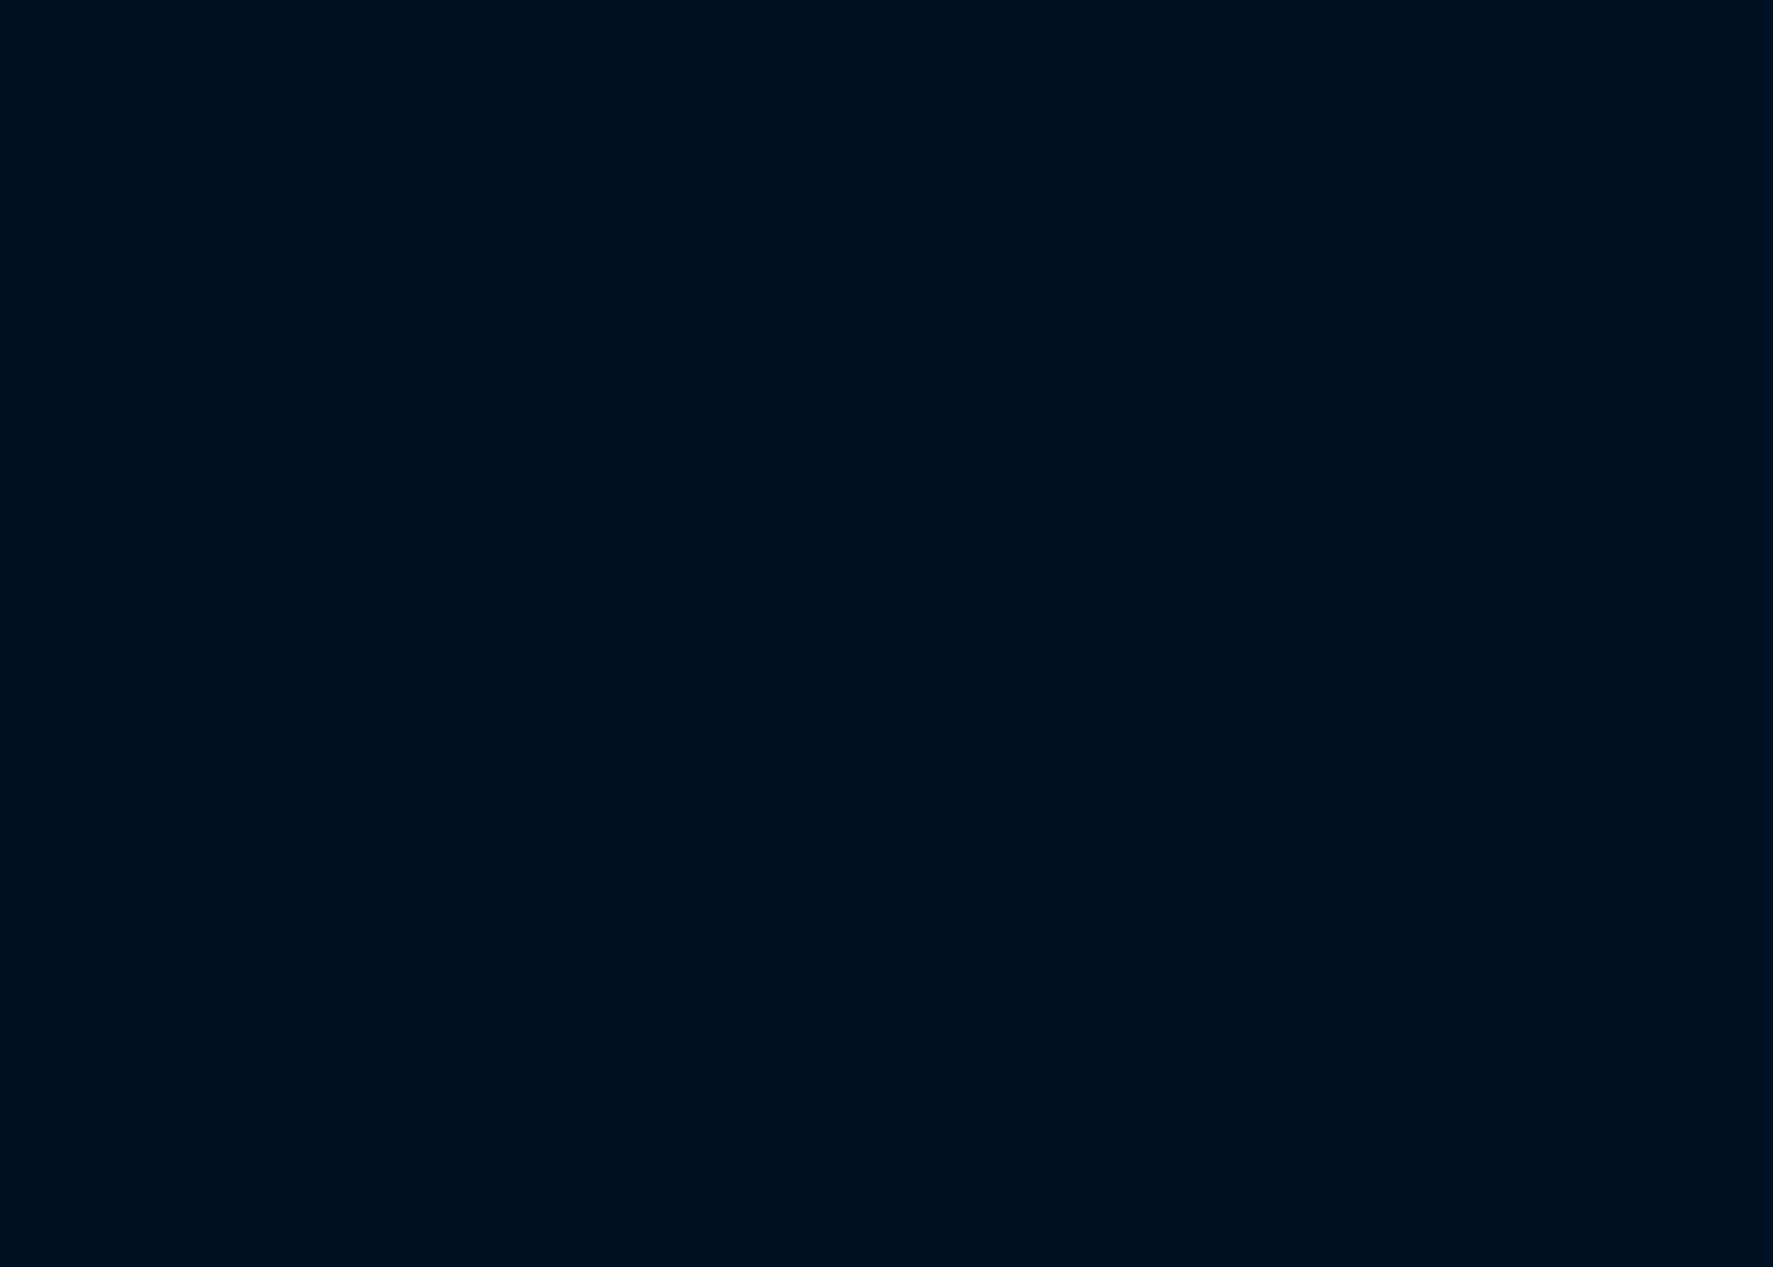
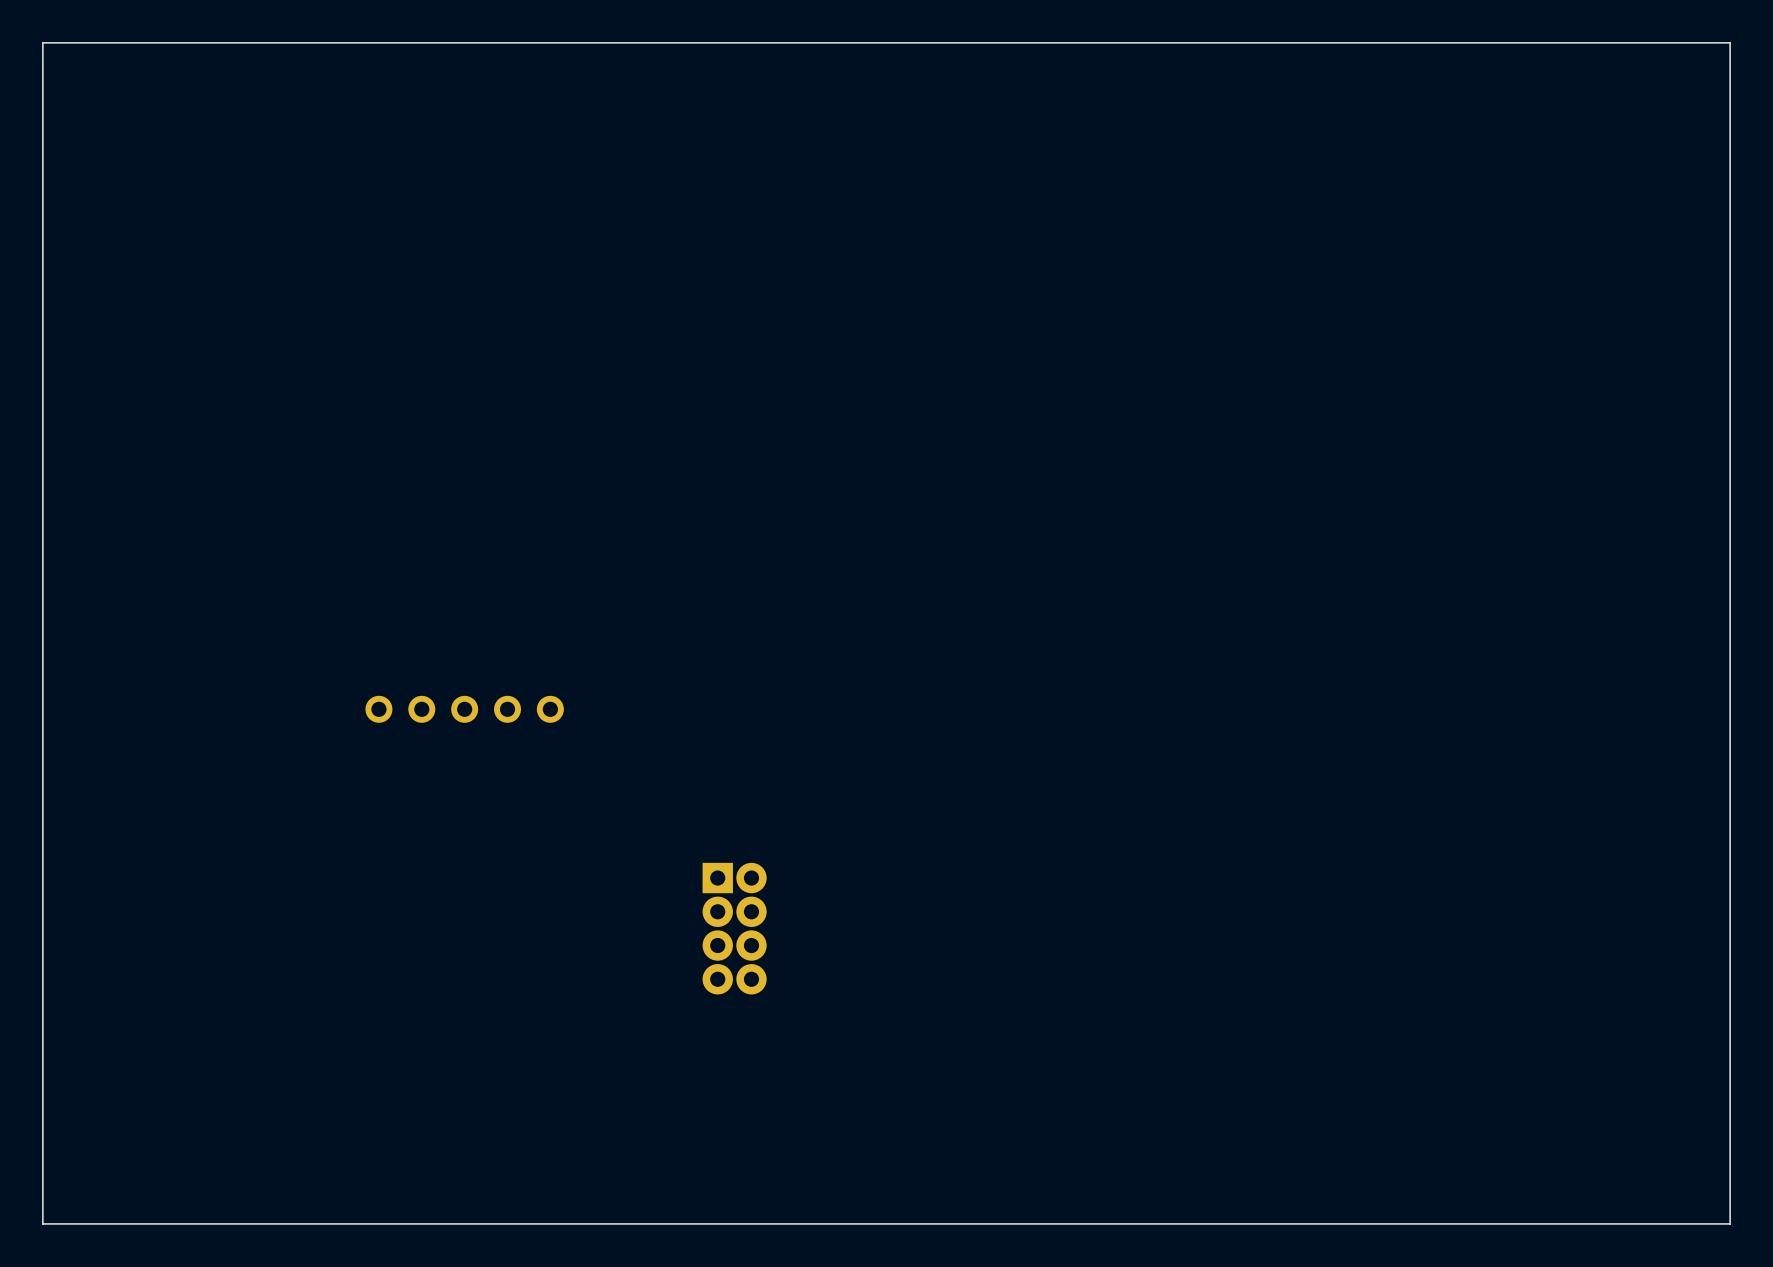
board edge: none -> (1730, 42) (42, 42) (42, 1223) (1730, 1223) (1730, 42)
part: none -> (464, 709)
part: none -> (734, 928)

